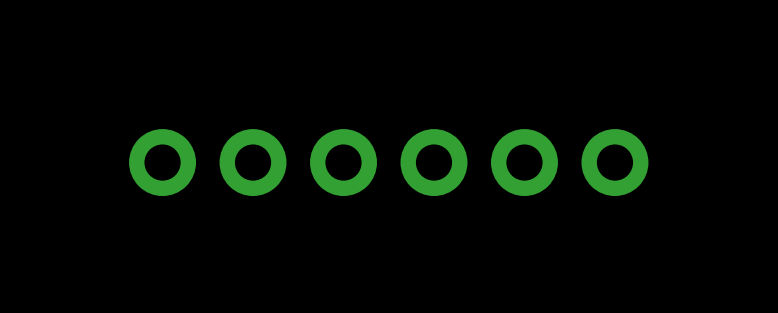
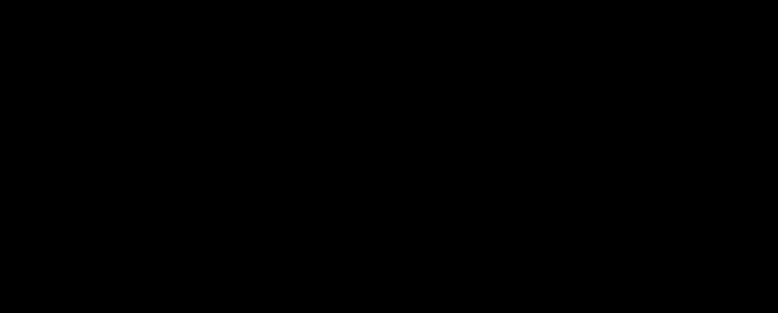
part: (388, 162) -> none

